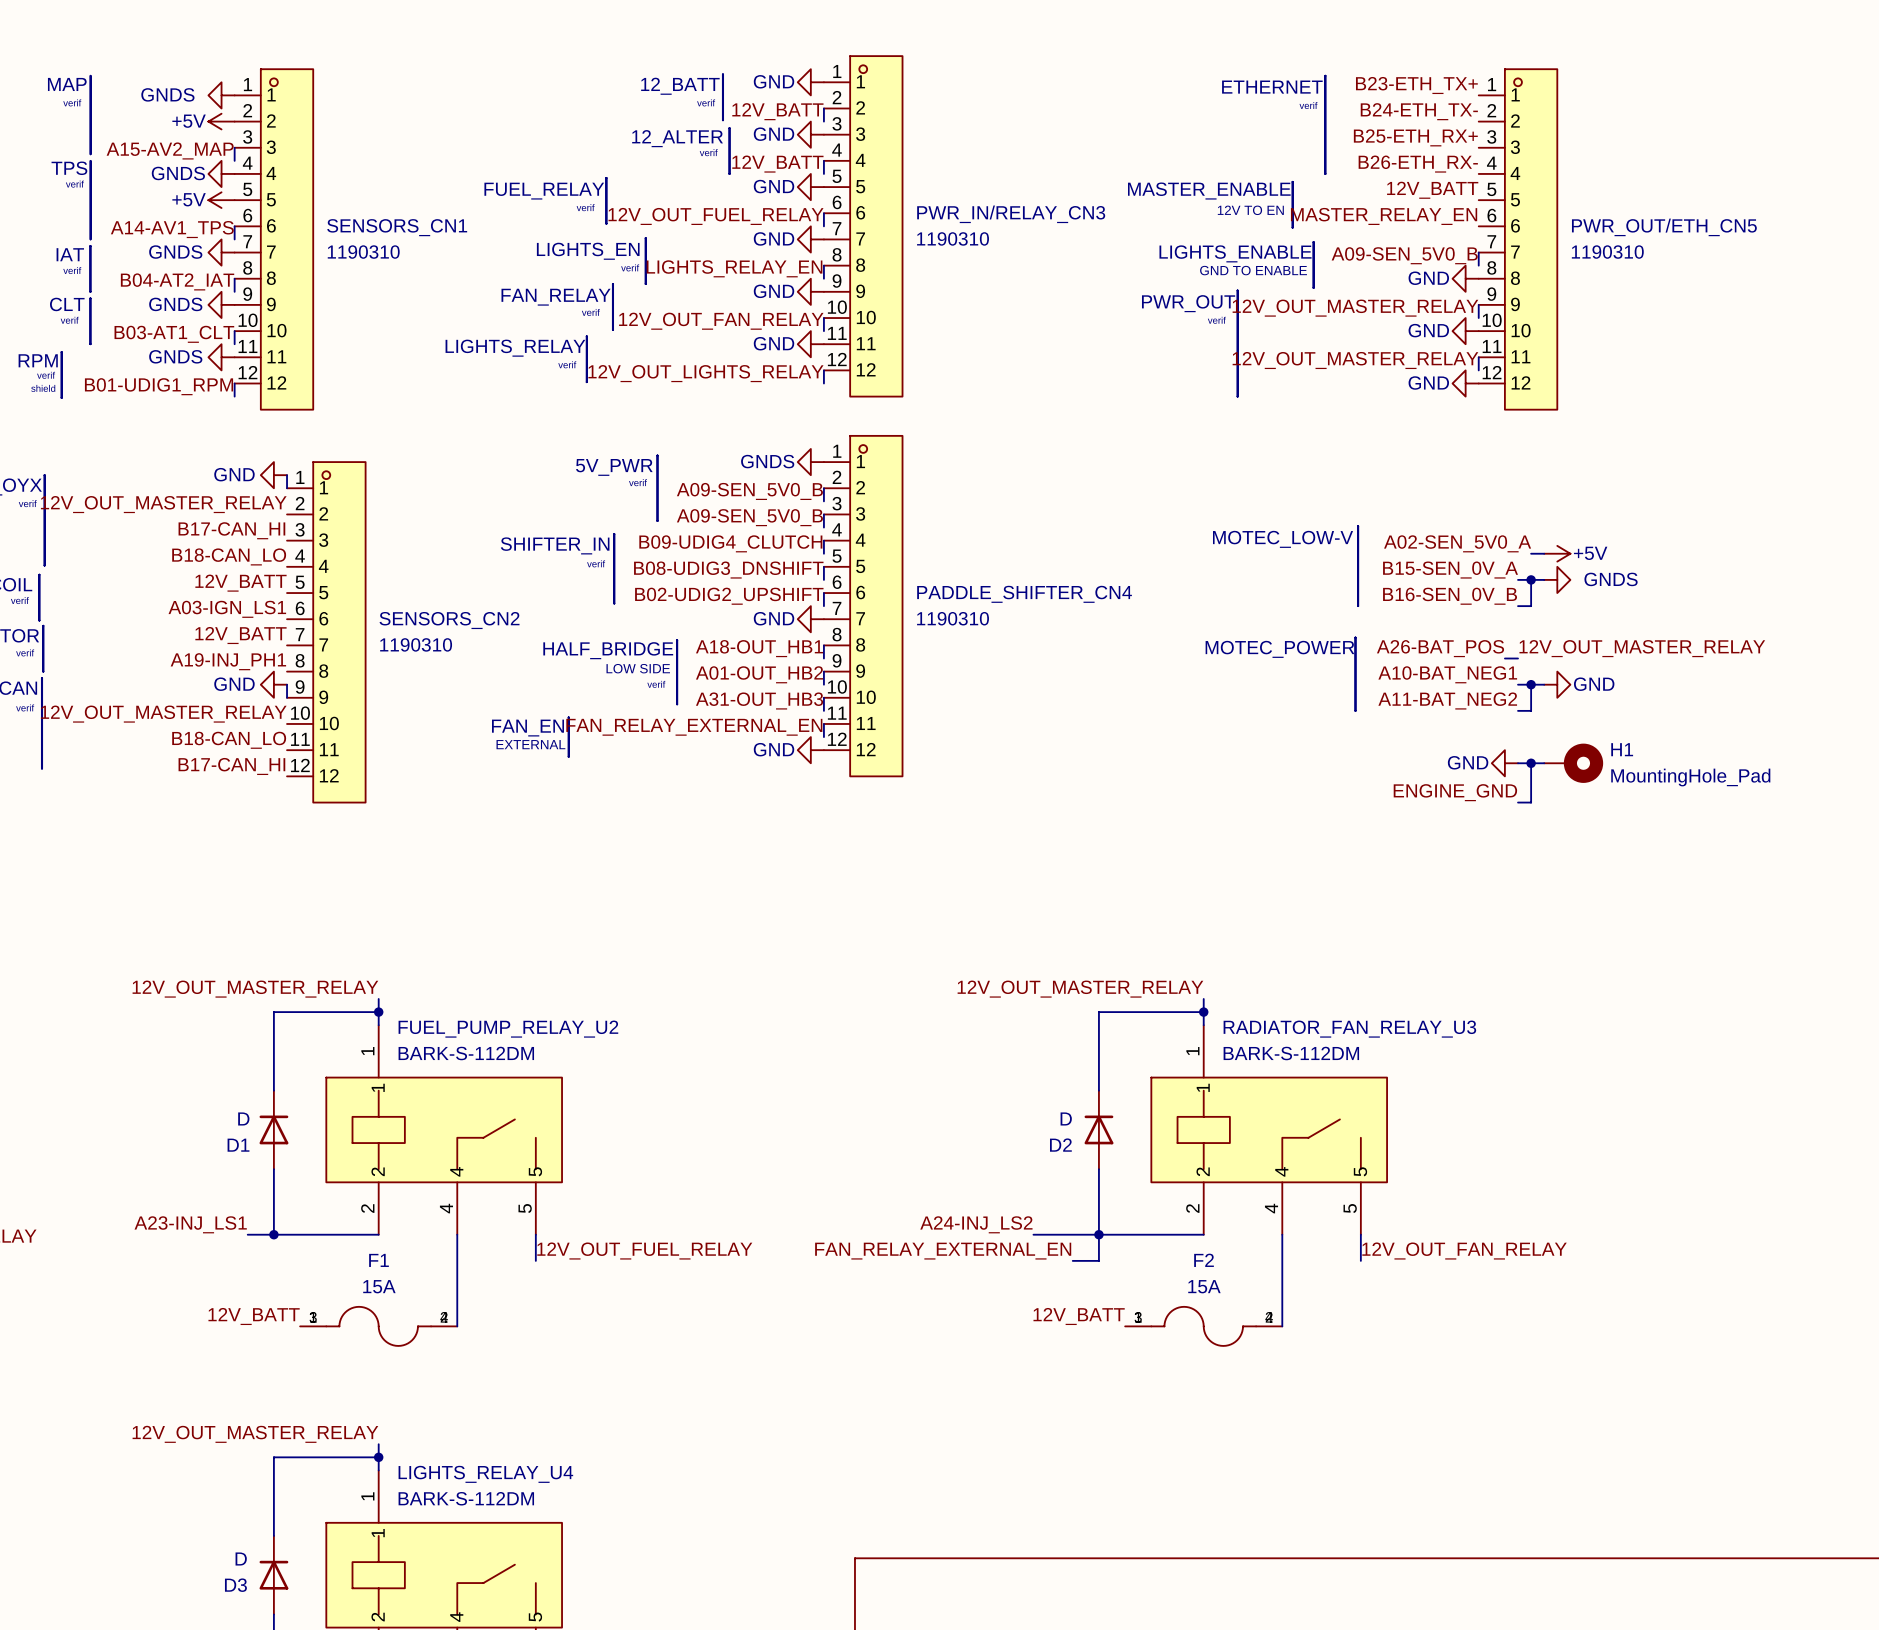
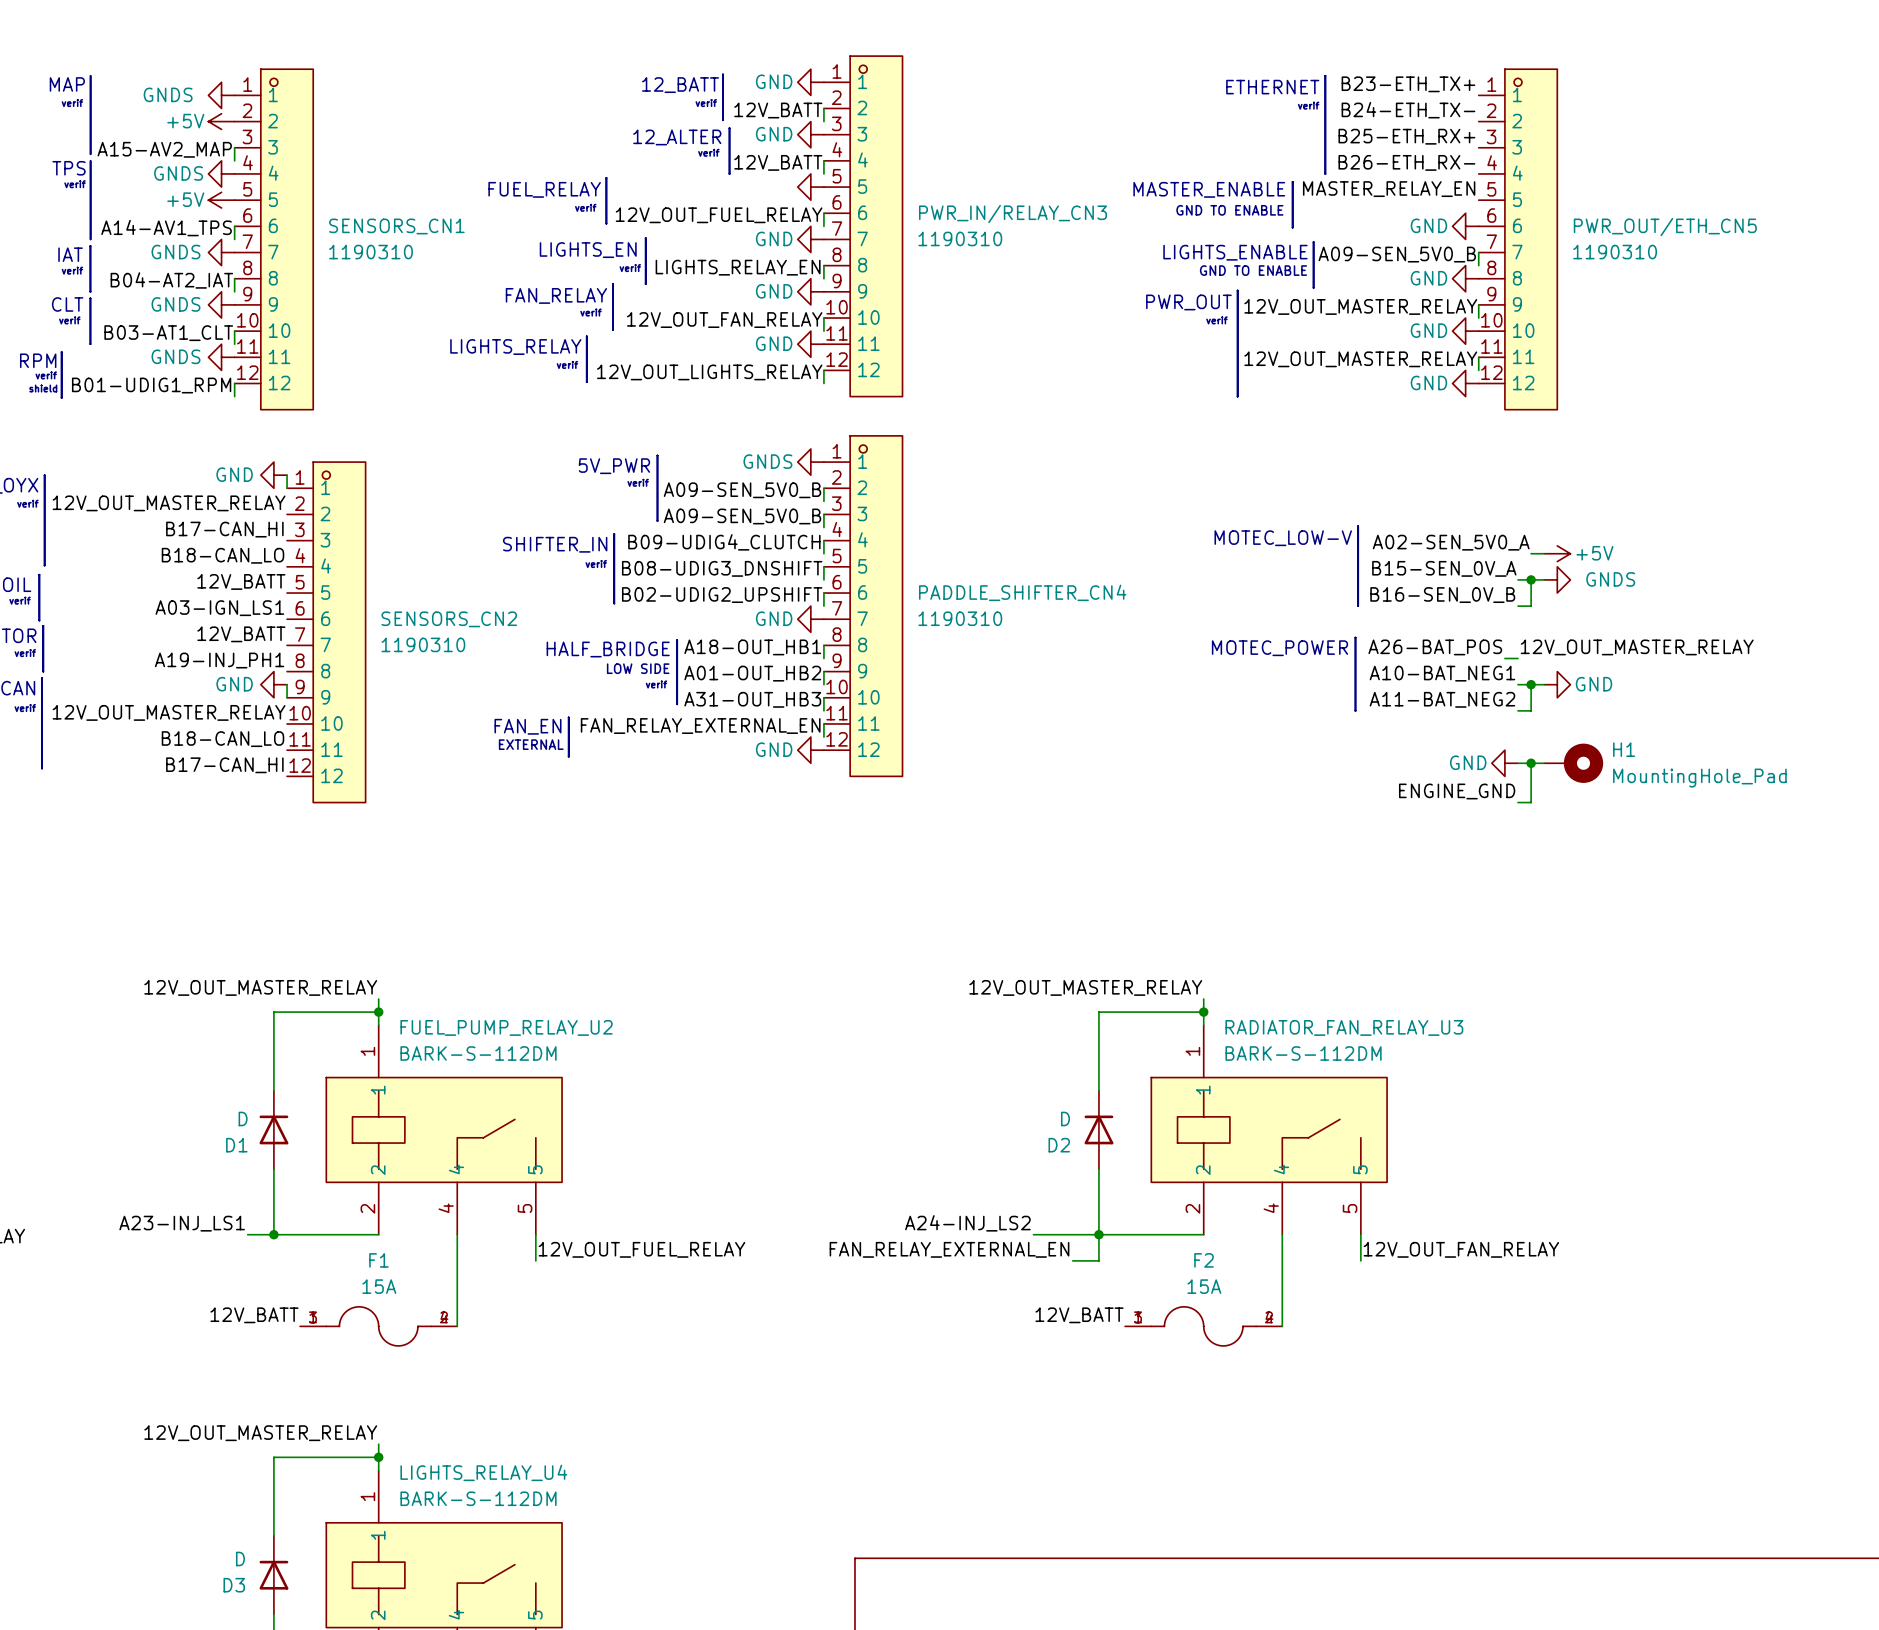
power symbol text: GND (774, 186) -> none
label: 12V_BATT (1432, 190) -> MASTER_RELAY_EN (1389, 189)
text: none -> GND TO ENABLE (1229, 210)
text: 12V TO EN (1250, 210) -> none
label: MASTER_RELAY_EN (1384, 216) -> none
power symbol: none -> GND (1465, 226)

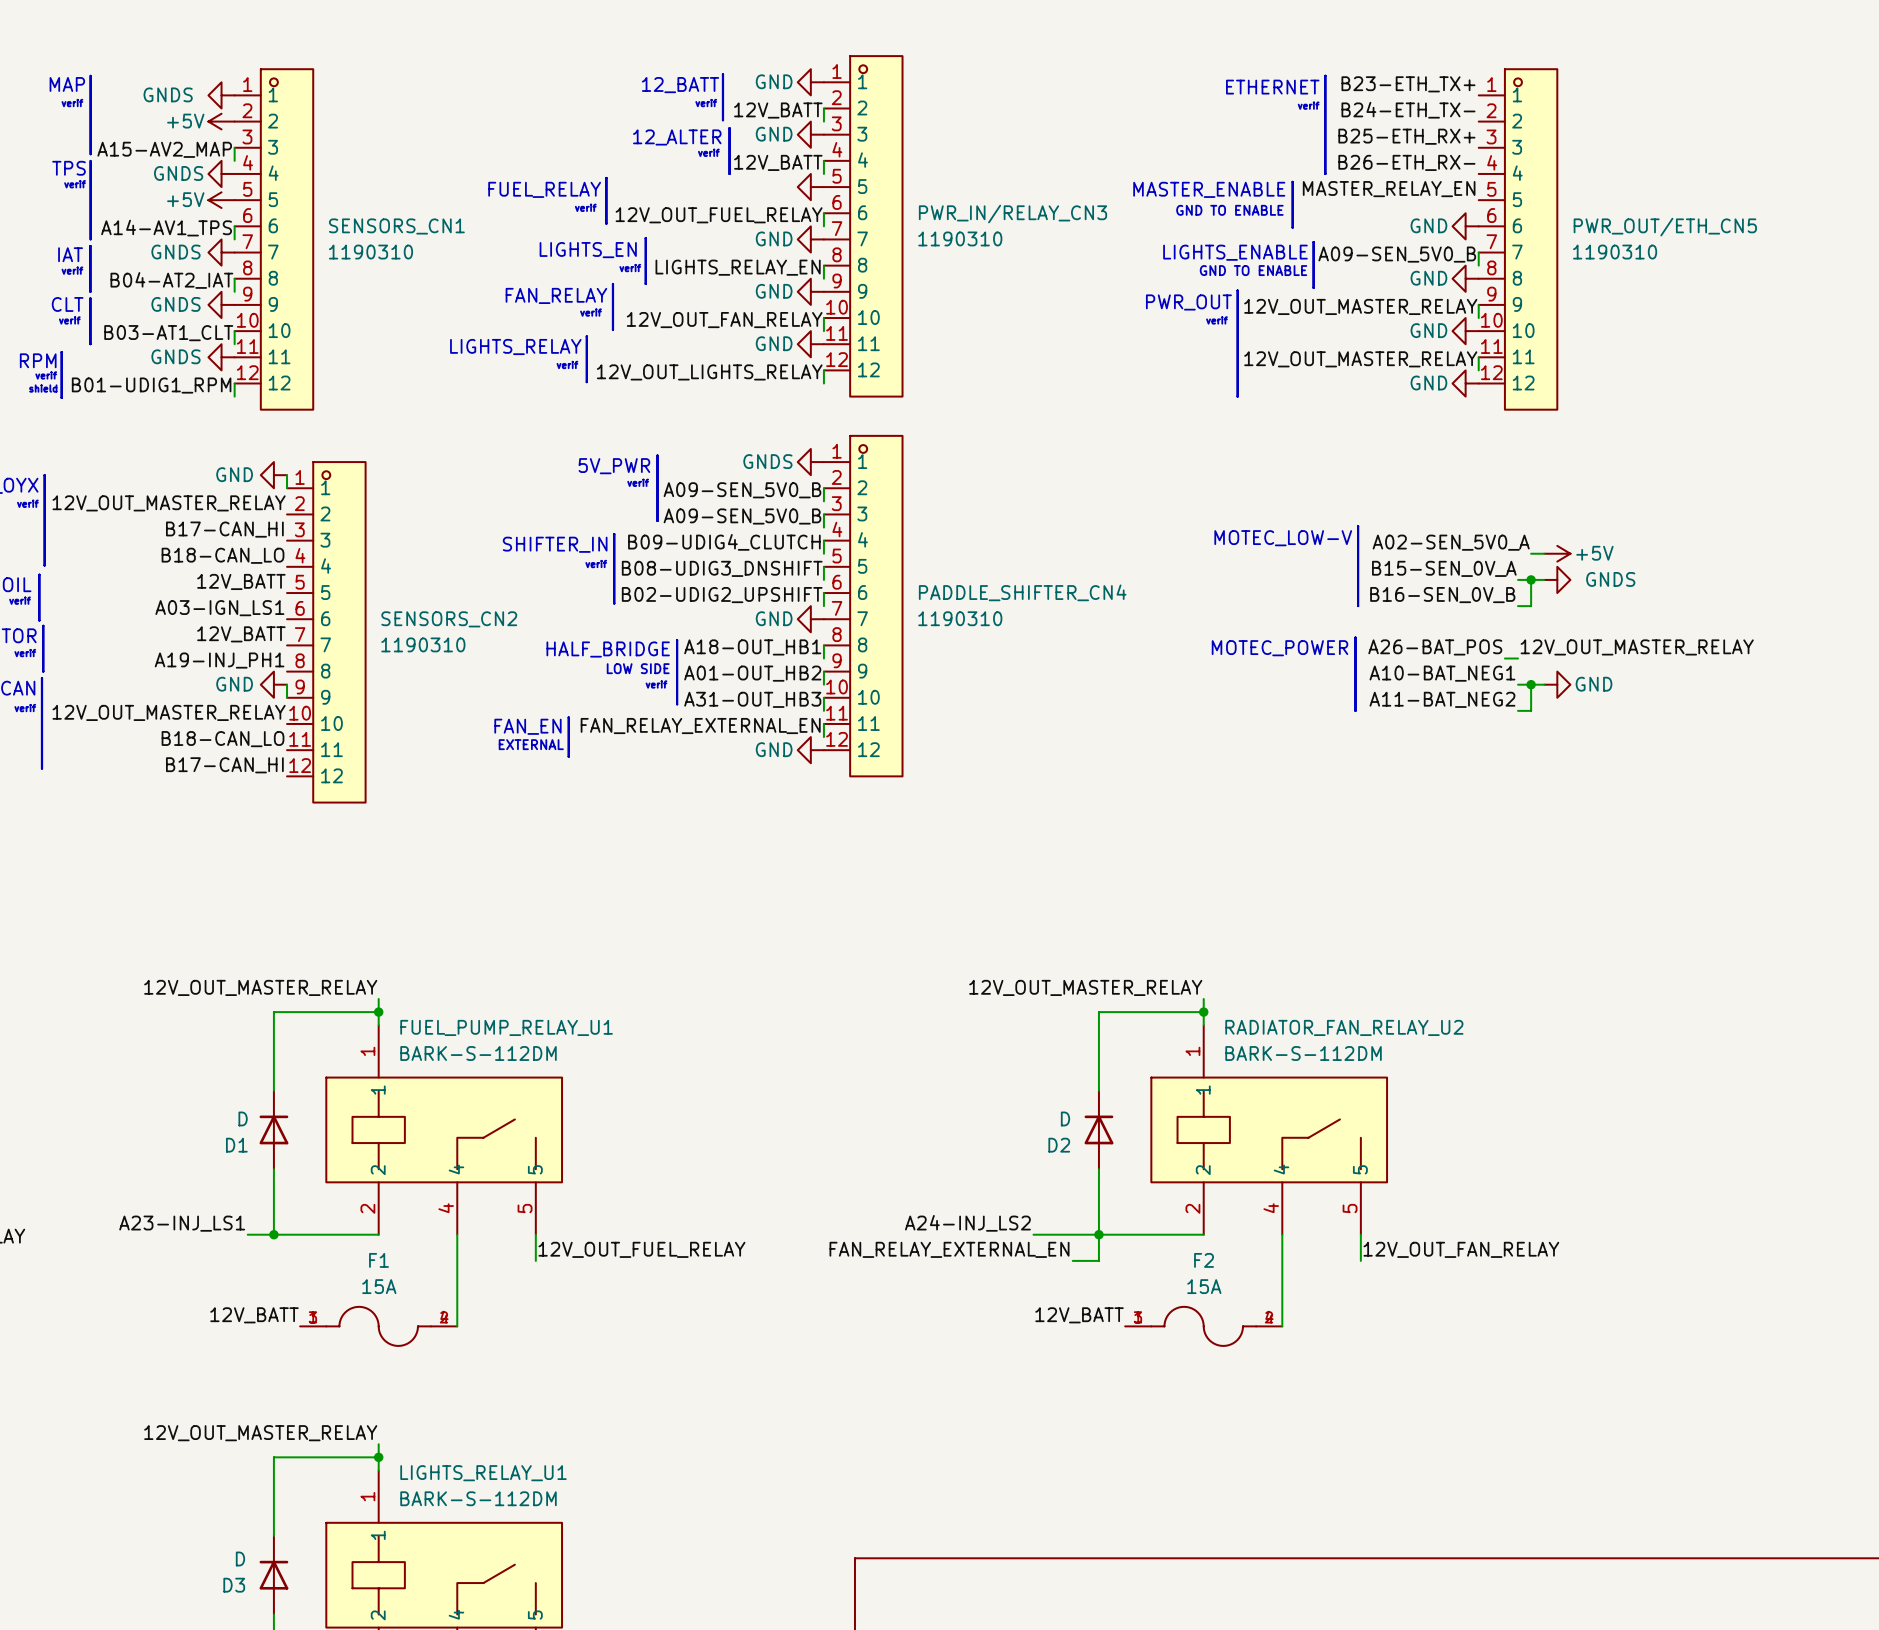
power symbol: GND (1504, 763) -> none
wire: (1518, 763) (1544, 763) -> none
wire: (1531, 763) (1531, 802) (1518, 802) -> none
junction: (1531, 763) -> none
H1: MountingHole_Pad (1573, 763) -> none
label: ENGINE_GND (1457, 791) -> none
FUEL_PUMP_RELAY_U2 name: FUEL_PUMP_RELAY_U2 (506, 1027) -> FUEL_PUMP_RELAY_U1 (506, 1027)
RADIATOR_FAN_RELAY_U3 name: RADIATOR_FAN_RELAY_U3 (1344, 1027) -> RADIATOR_FAN_RELAY_U2 (1344, 1027)
LIGHTS_RELAY_U4 name: LIGHTS_RELAY_U4 (483, 1472) -> LIGHTS_RELAY_U1 (483, 1473)

